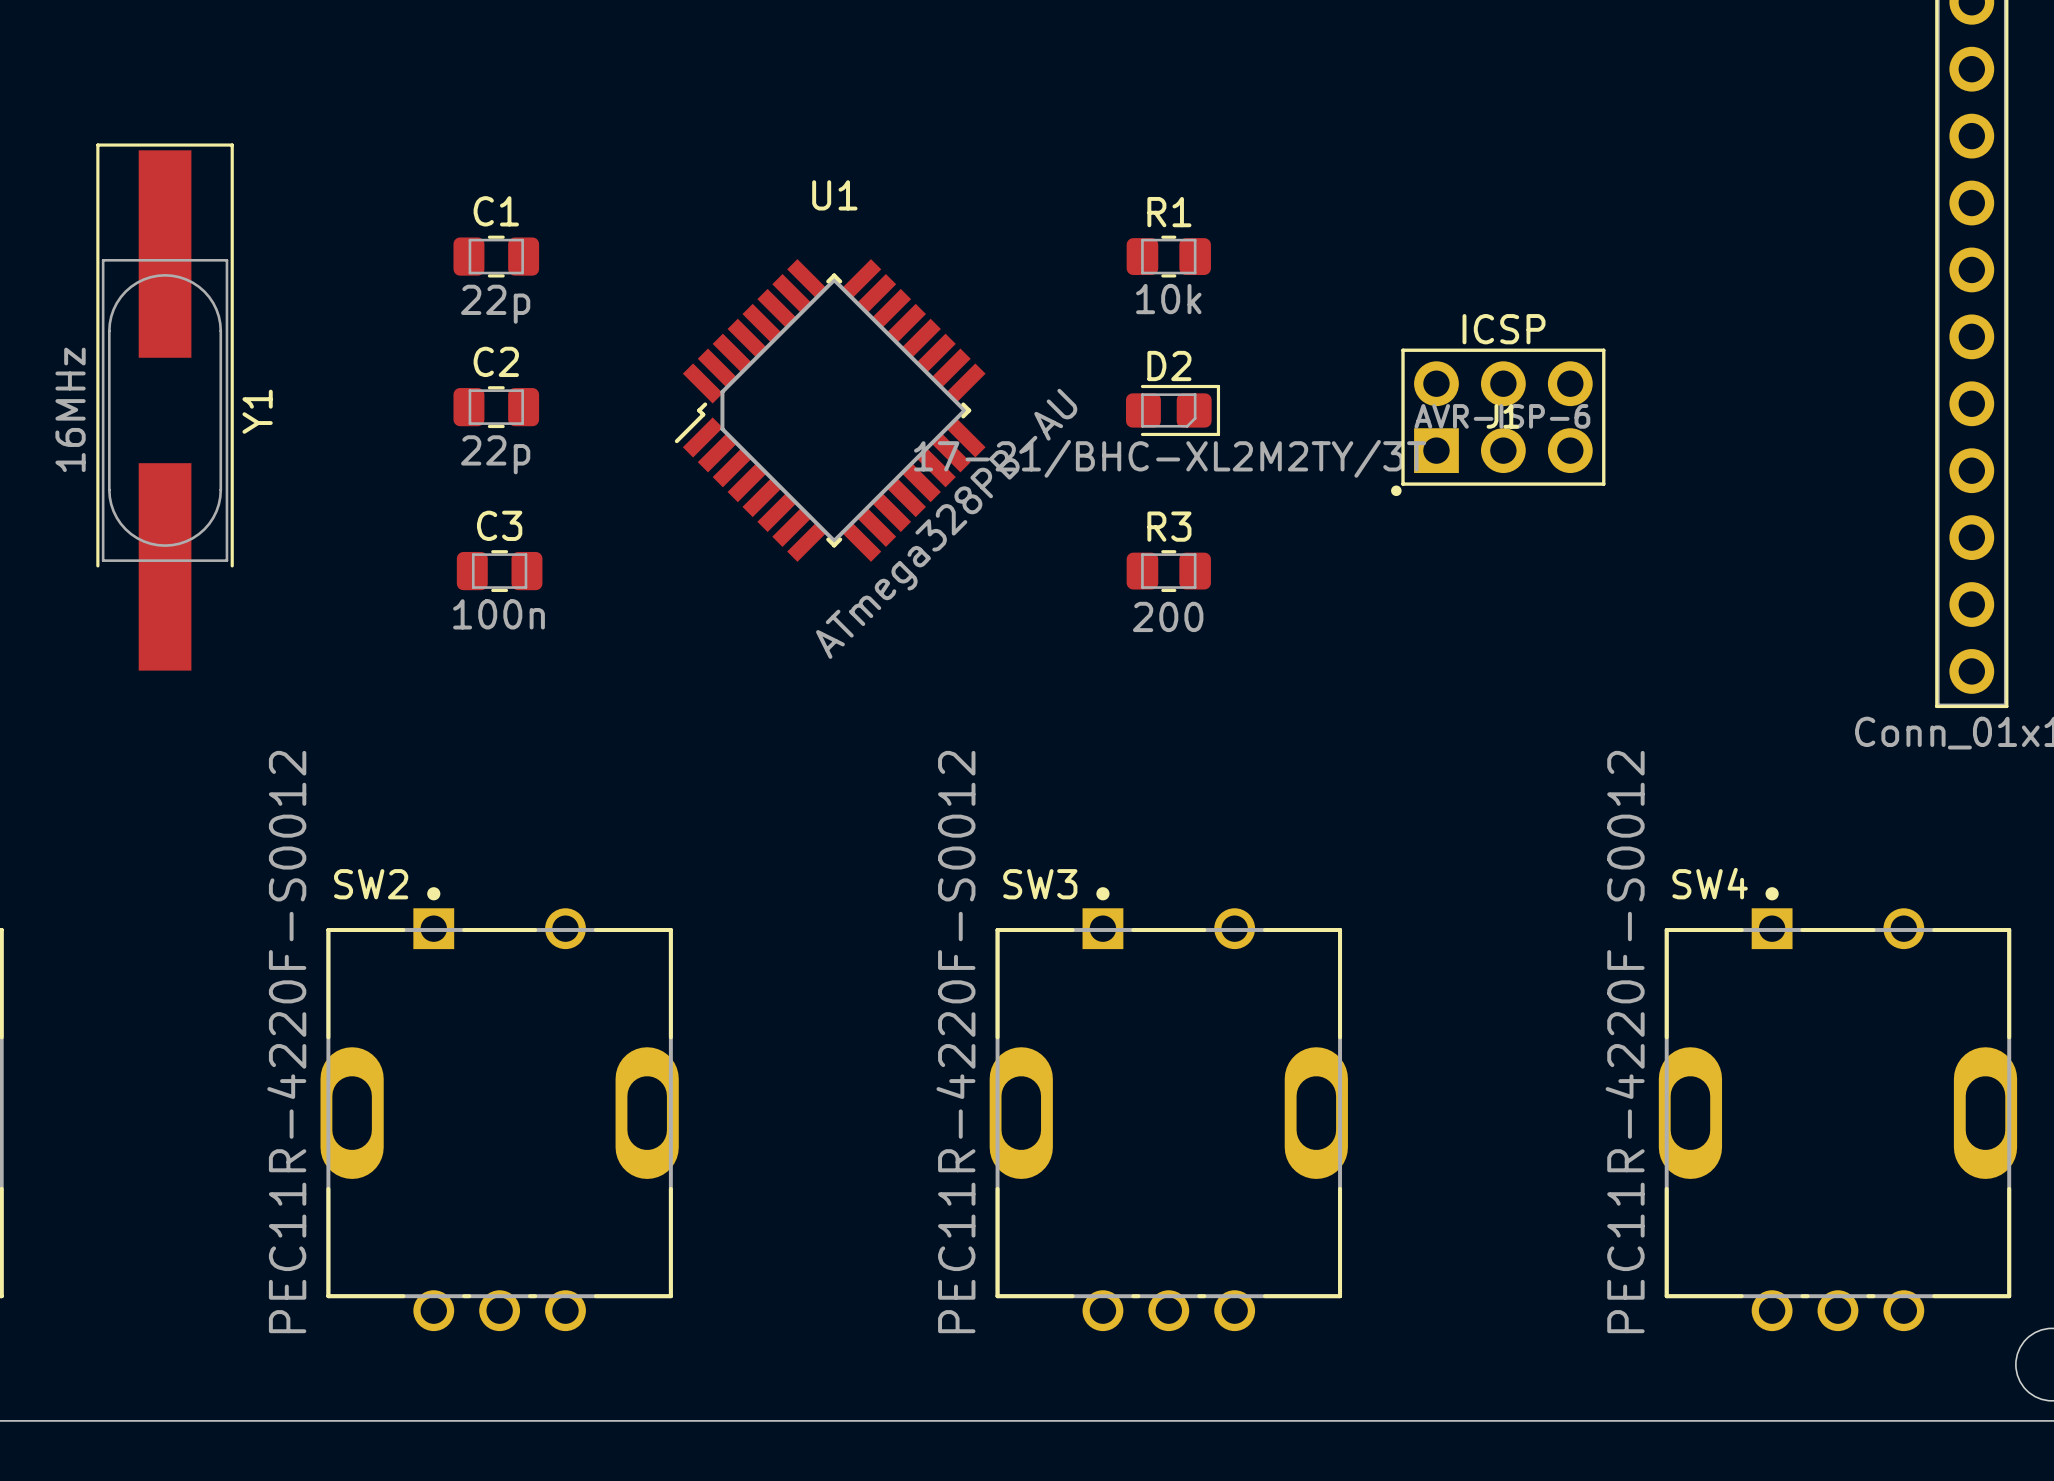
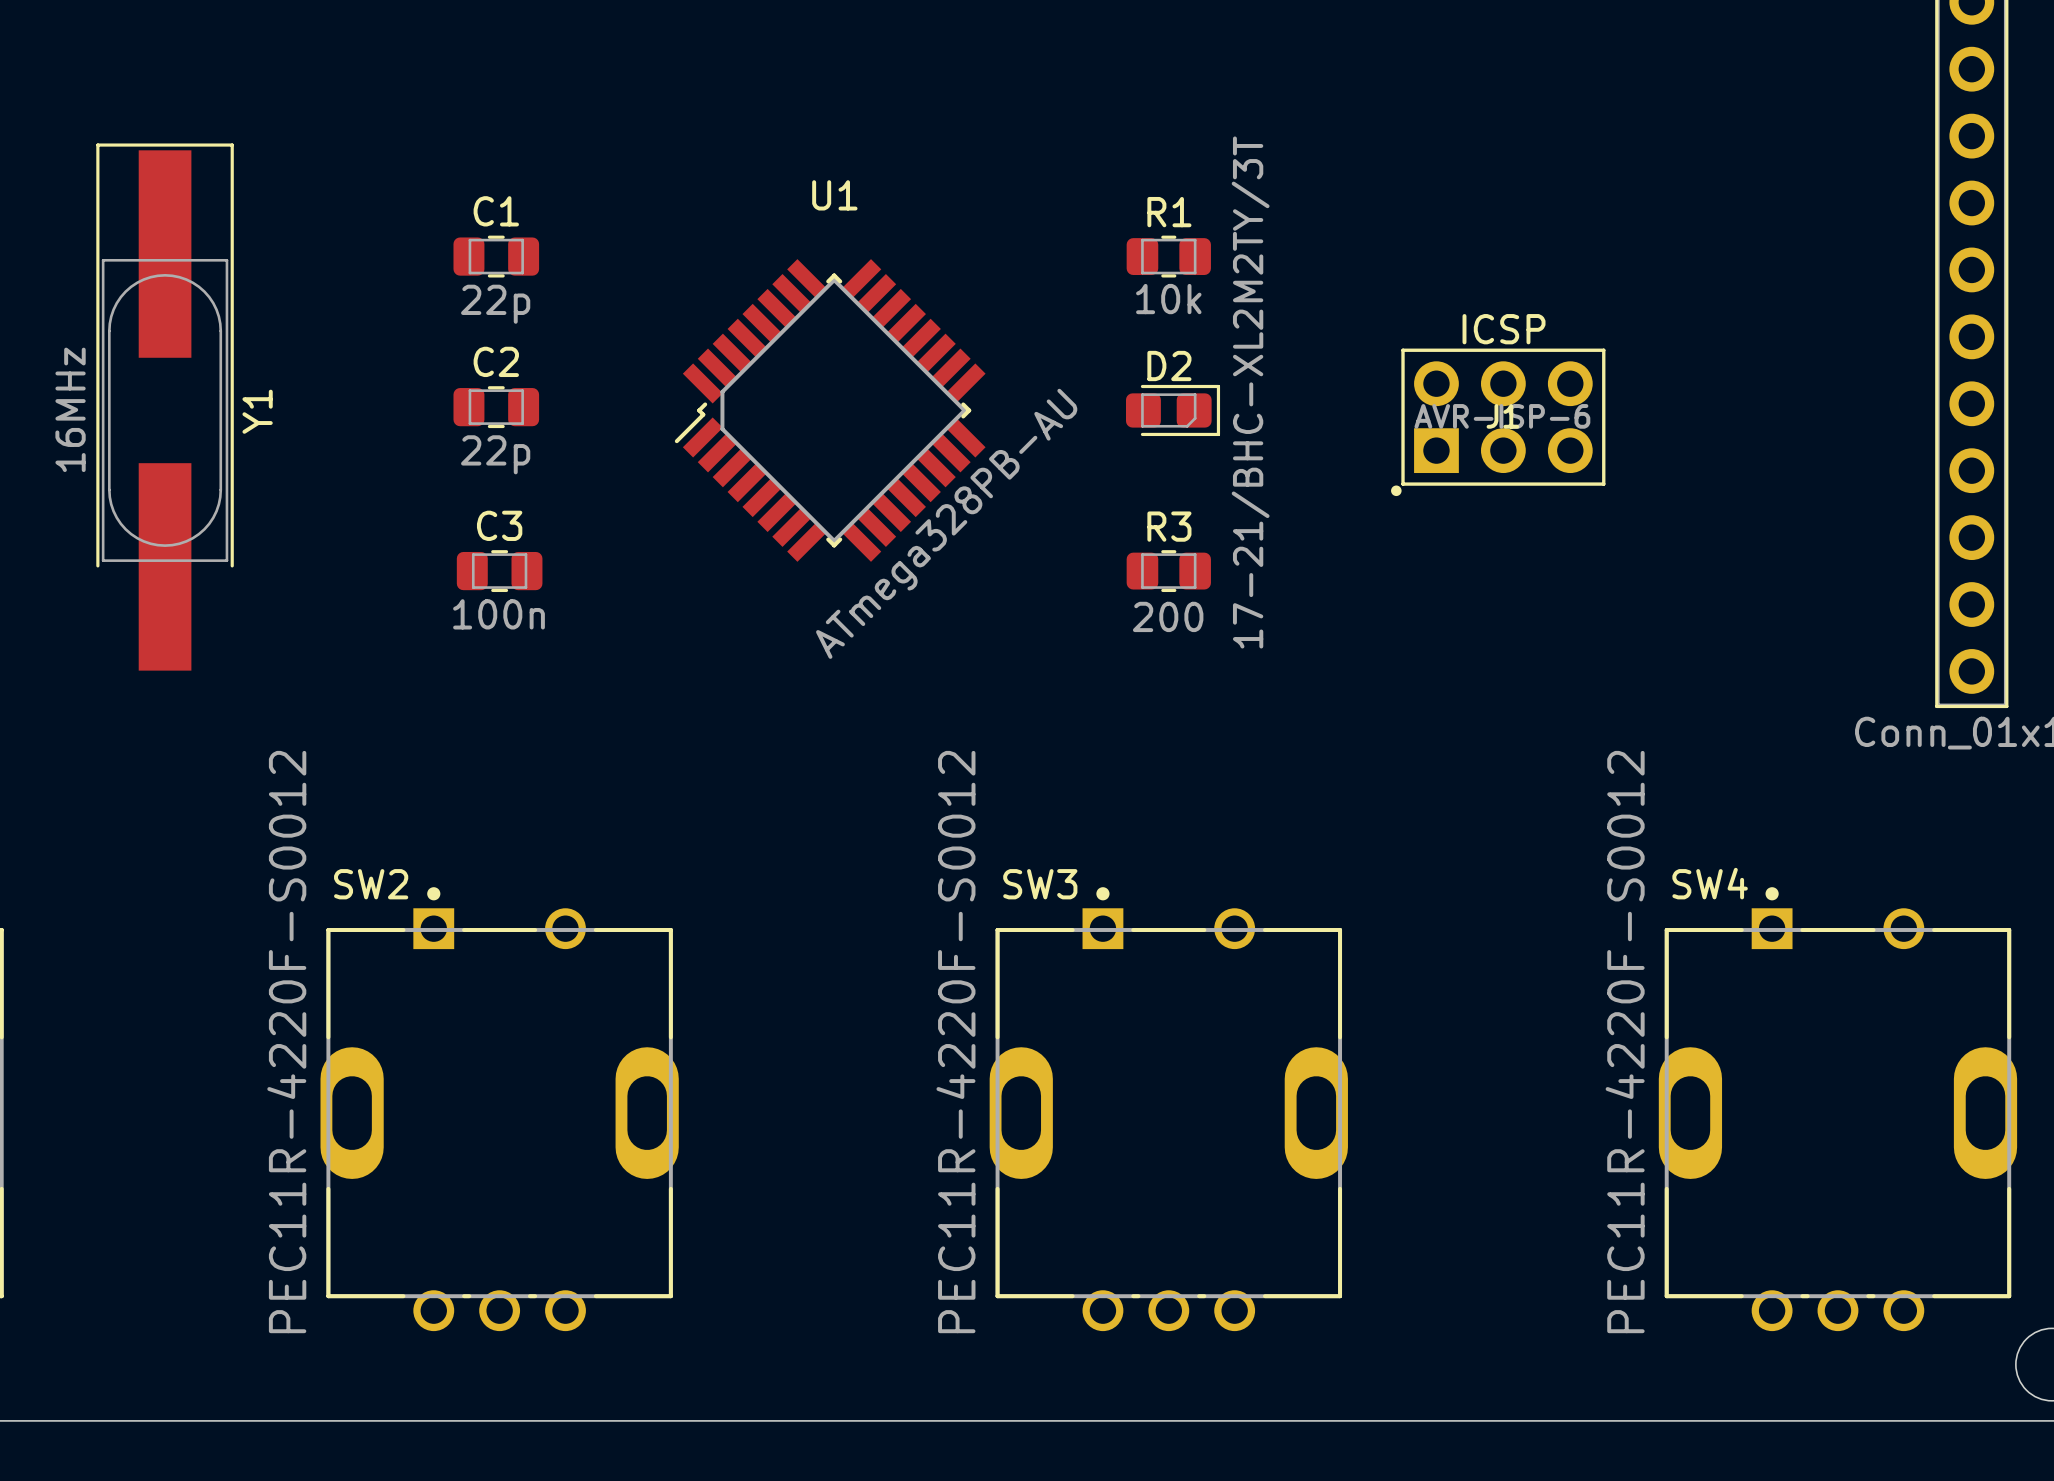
D2 value rotation: 0° (1170, 458) -> 90° counterclockwise (1250, 392)

